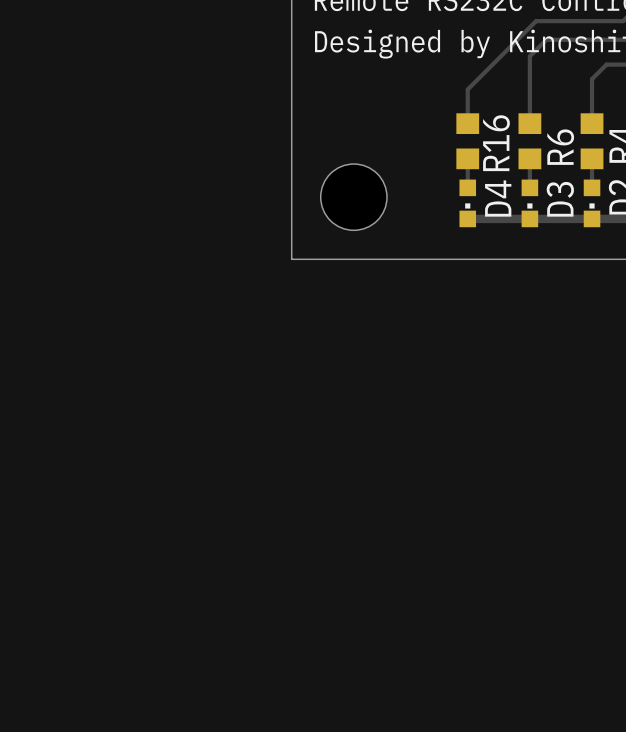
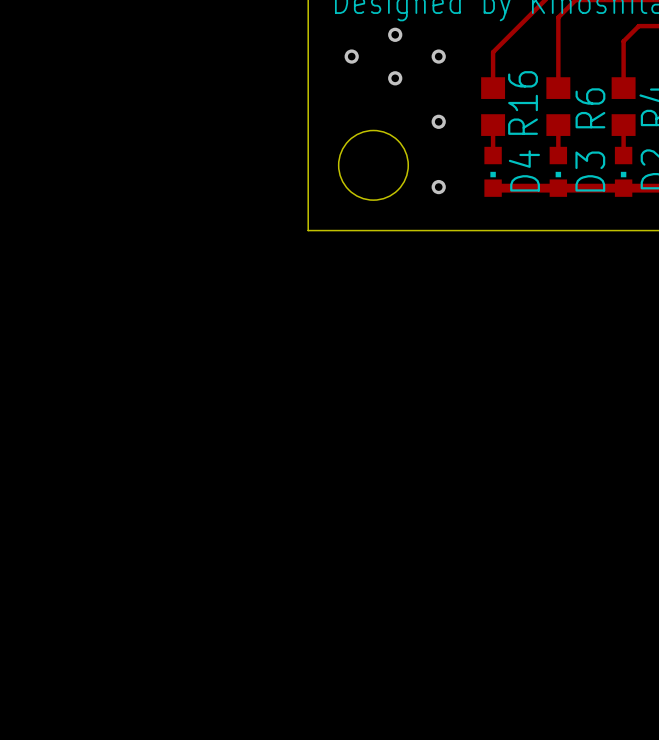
via: none -> (395, 34)
via: none -> (351, 56)
via: none -> (438, 56)
via: none -> (395, 78)
via: none -> (438, 121)
via: none -> (438, 187)

